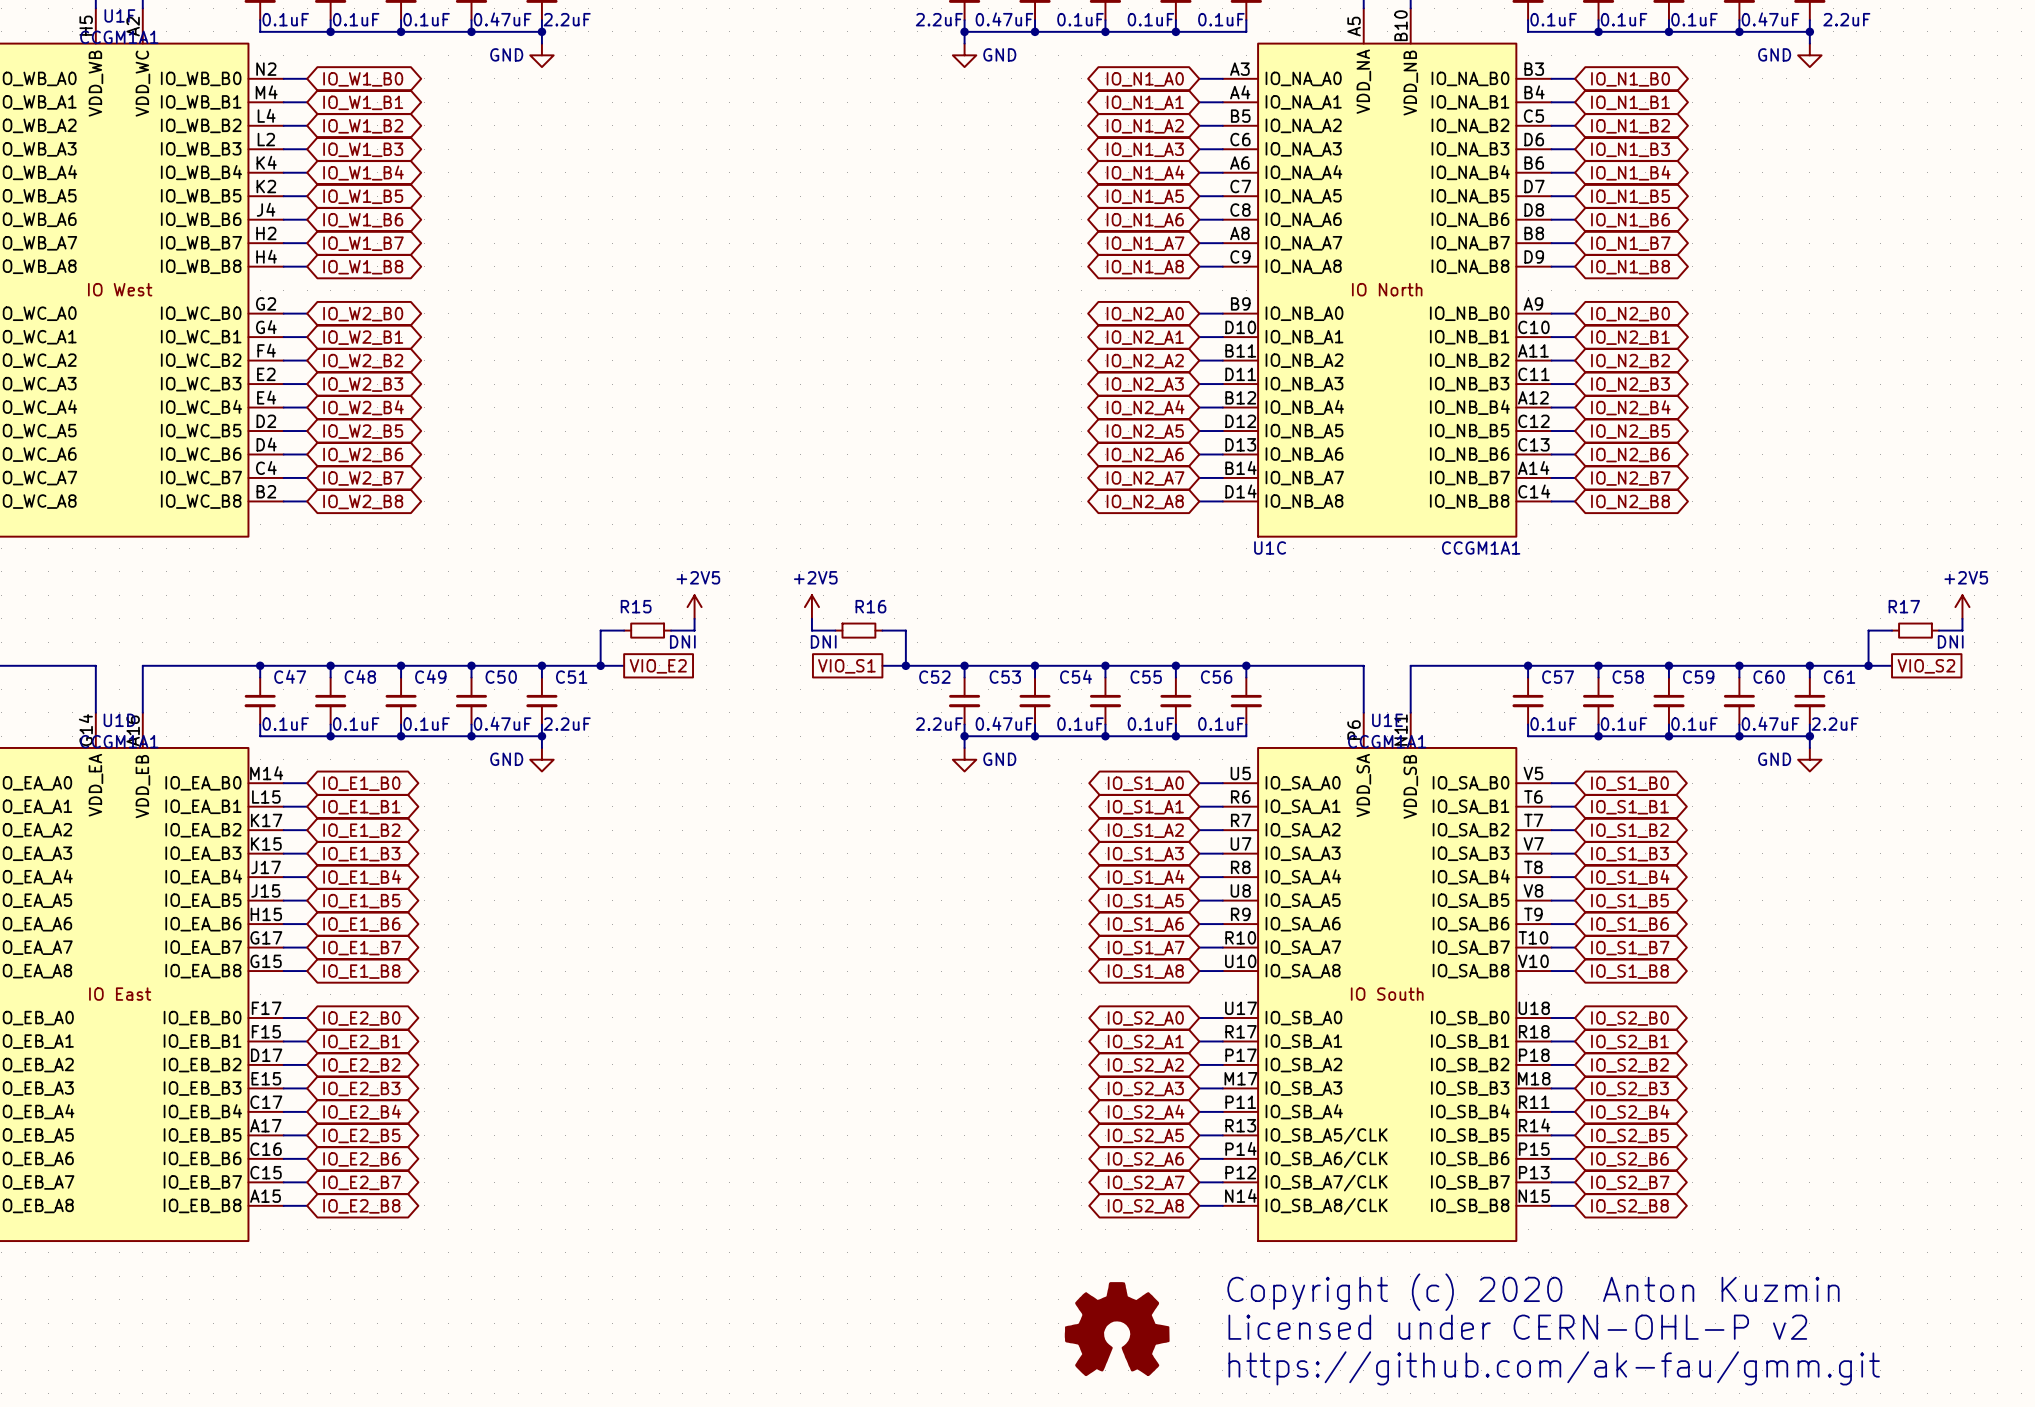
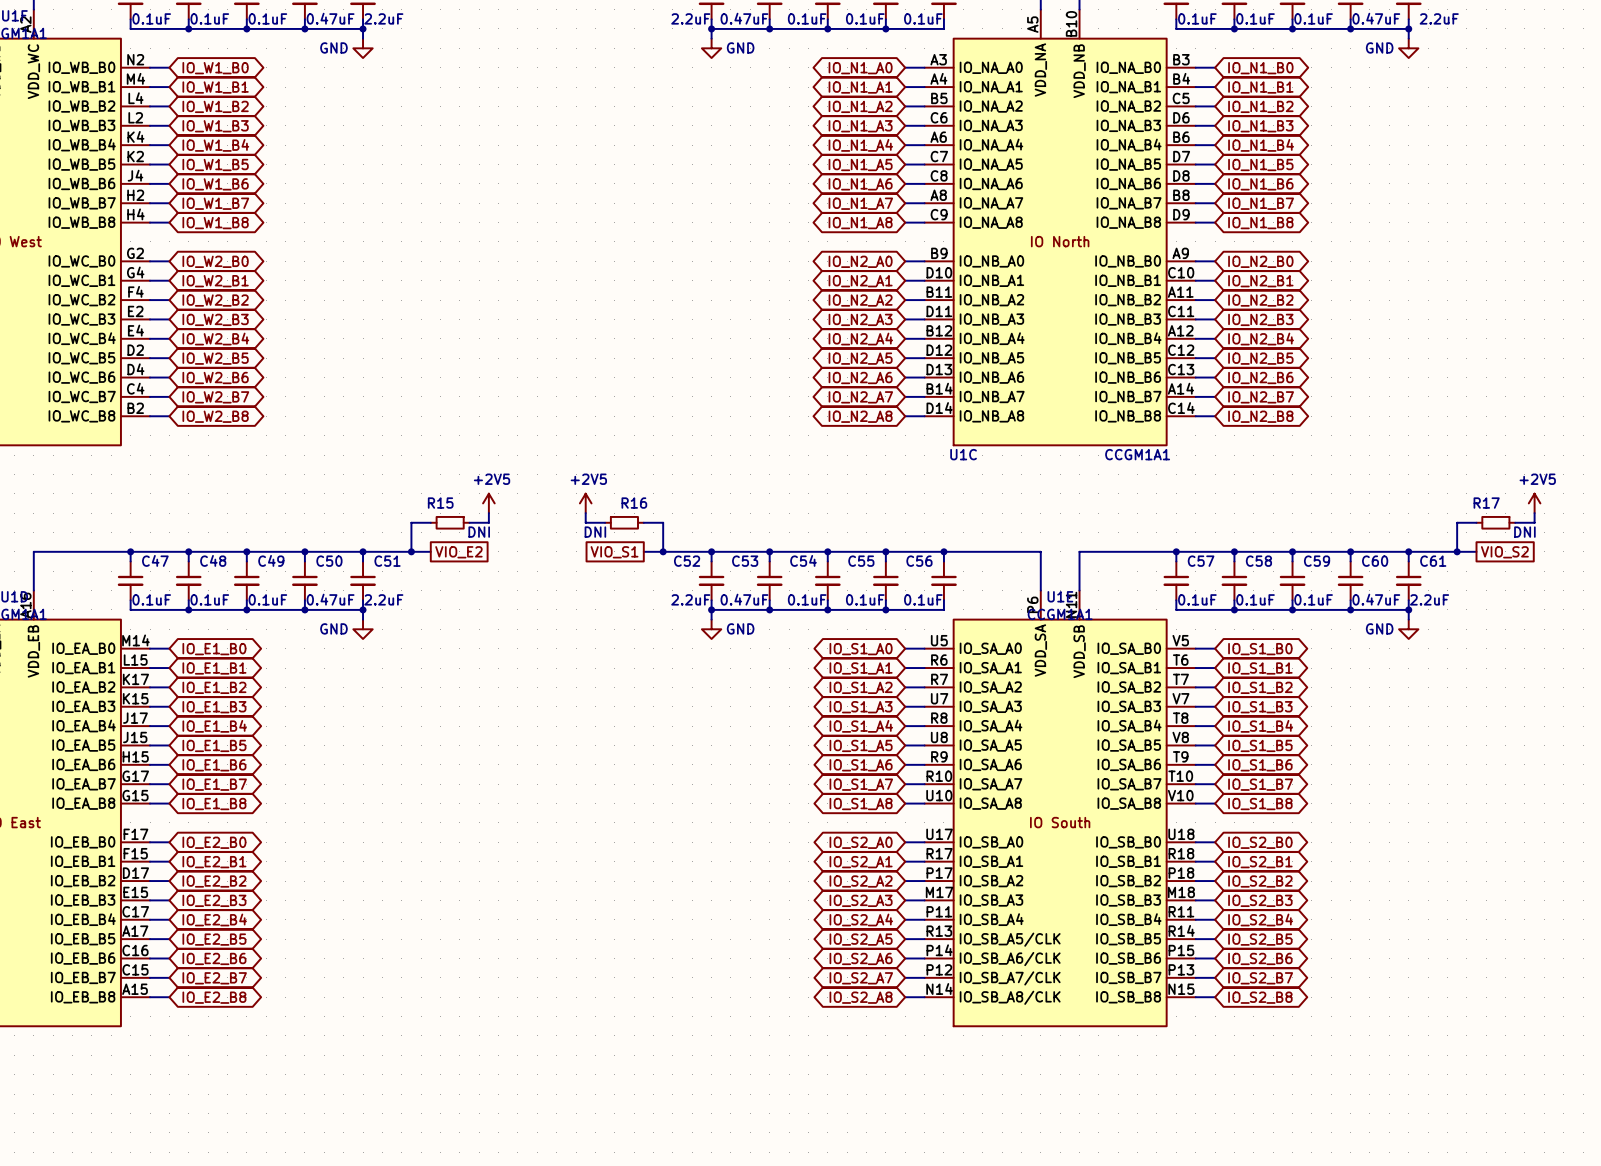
text: Copyright (c) 2020 Anton Kuzmin (1533, 1292) -> none
text: Licensed under CERN-OHL-P v2 (1517, 1327) -> none
power symbol: (1117, 1329) -> none
text: https://github.com/ak-fau/gmm.git (1554, 1368) -> none

